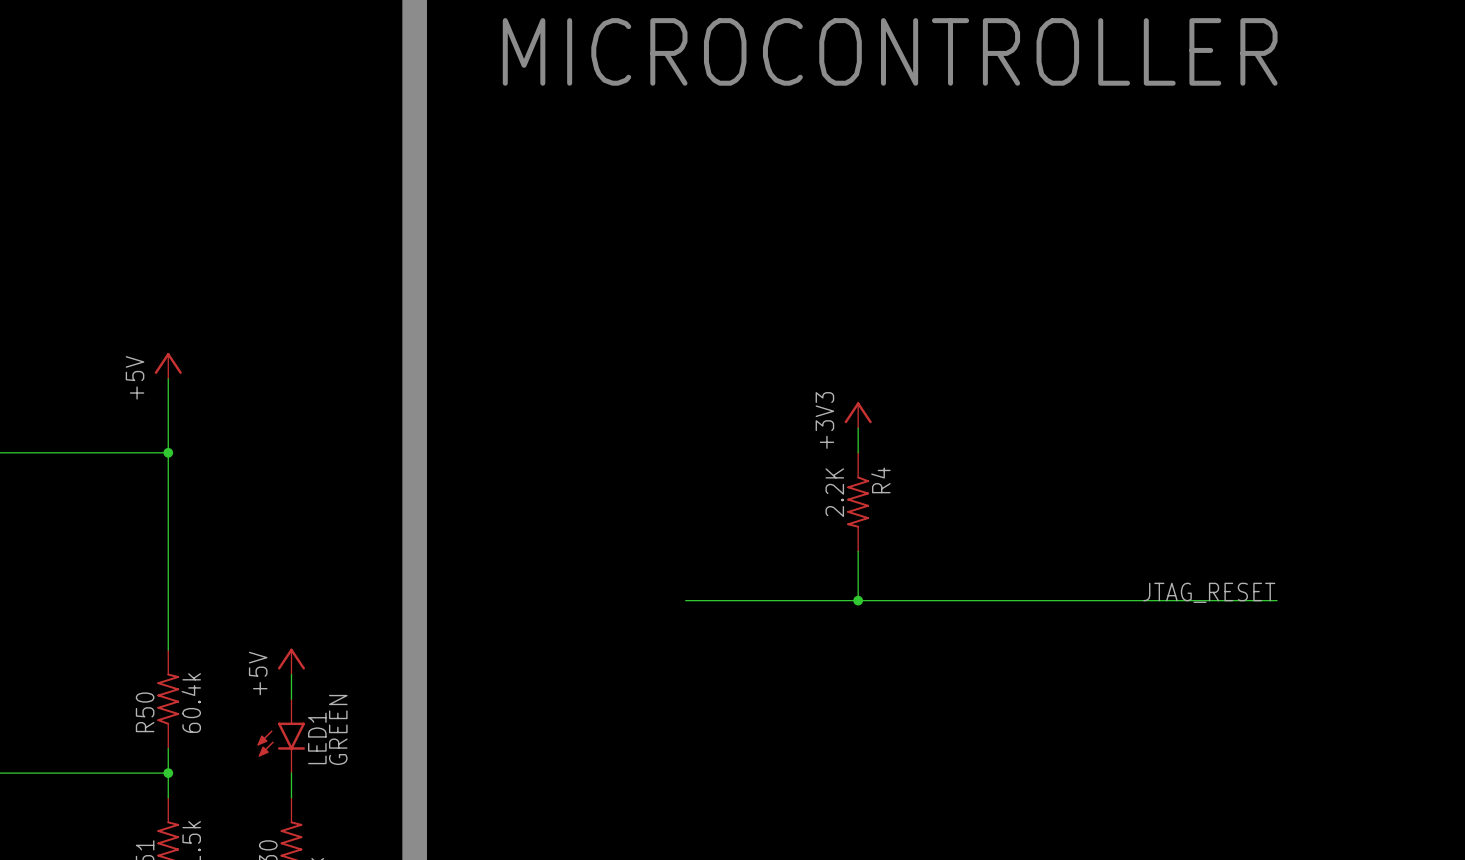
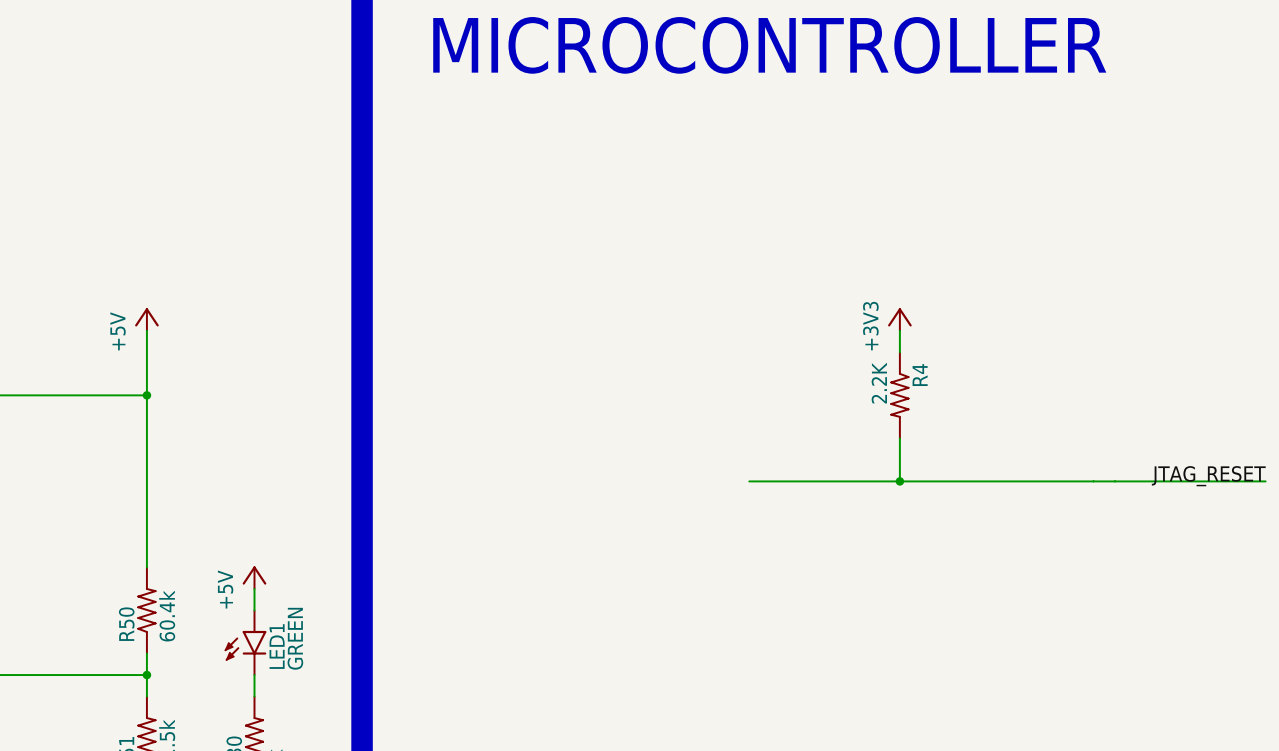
power symbol position: +3V3 (858, 415) -> +3V3 (899, 319)
wire: (858, 428) (858, 452) -> (899, 330) (899, 352)
R4 position: (858, 502) -> (899, 395)
wire: none -> (899, 438) (899, 481)
wire: (858, 551) (858, 600) -> (749, 481) (1265, 481)
junction: none -> (899, 481)
label position: JTAG_RESET (1209, 592) -> JTAG_RESET (1208, 476)
wire: (685, 600) (1277, 600) -> none
junction: (858, 600) -> none

